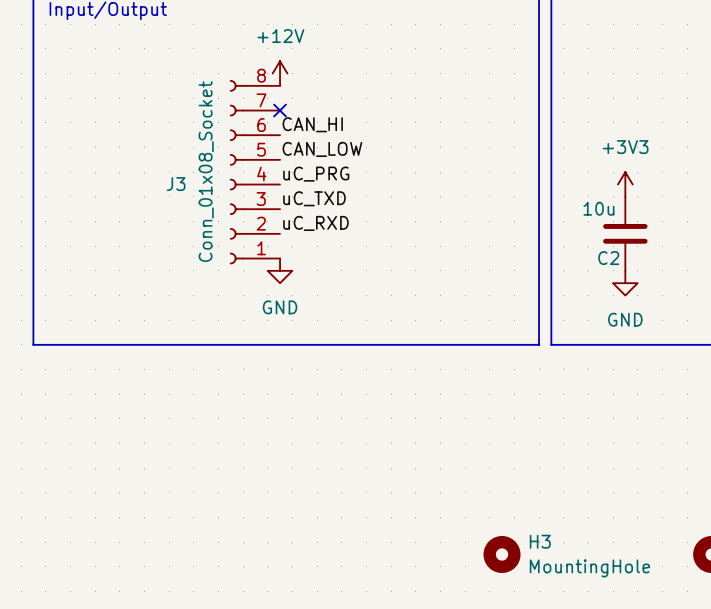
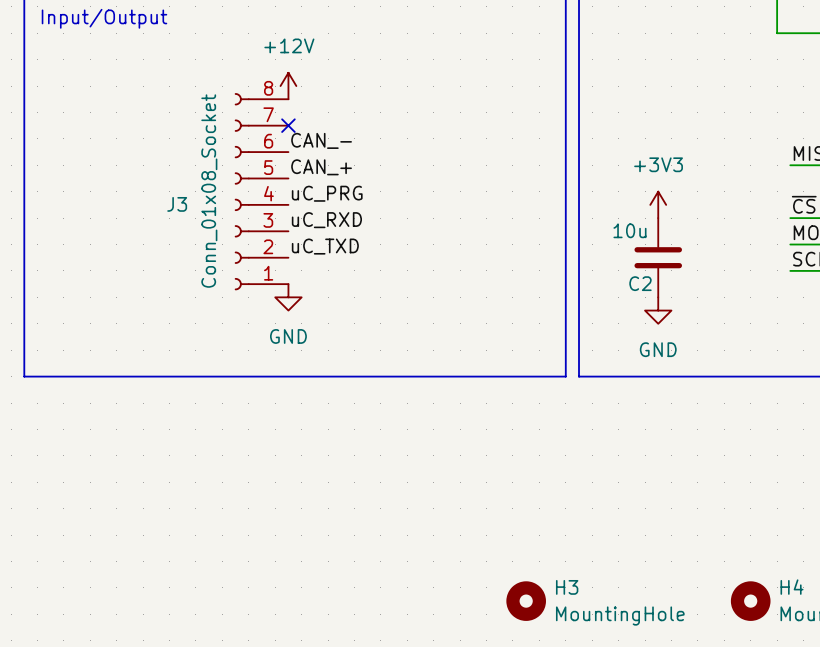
label: CAN_HI (312, 124) -> CAN_- (321, 140)
label: CAN_LOW (322, 149) -> CAN_+ (321, 167)
label: uC_TXD (314, 198) -> uC_RXD (326, 220)
label: uC_RXD (315, 223) -> uC_TXD (325, 246)

